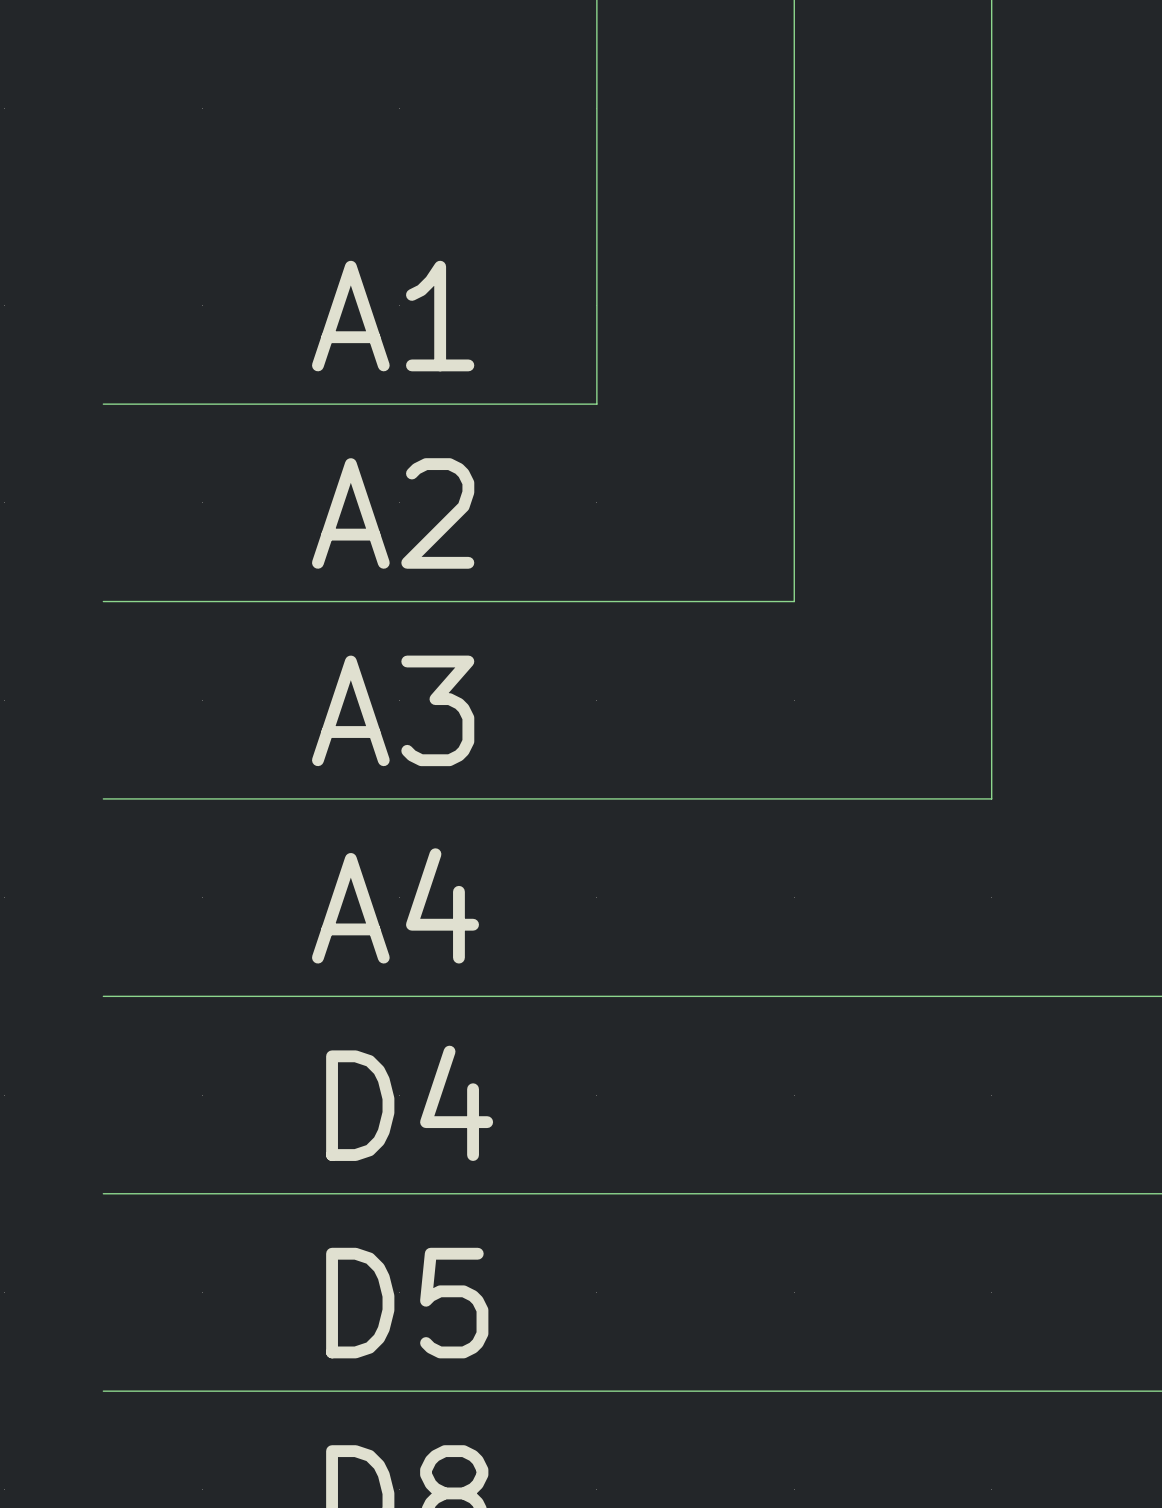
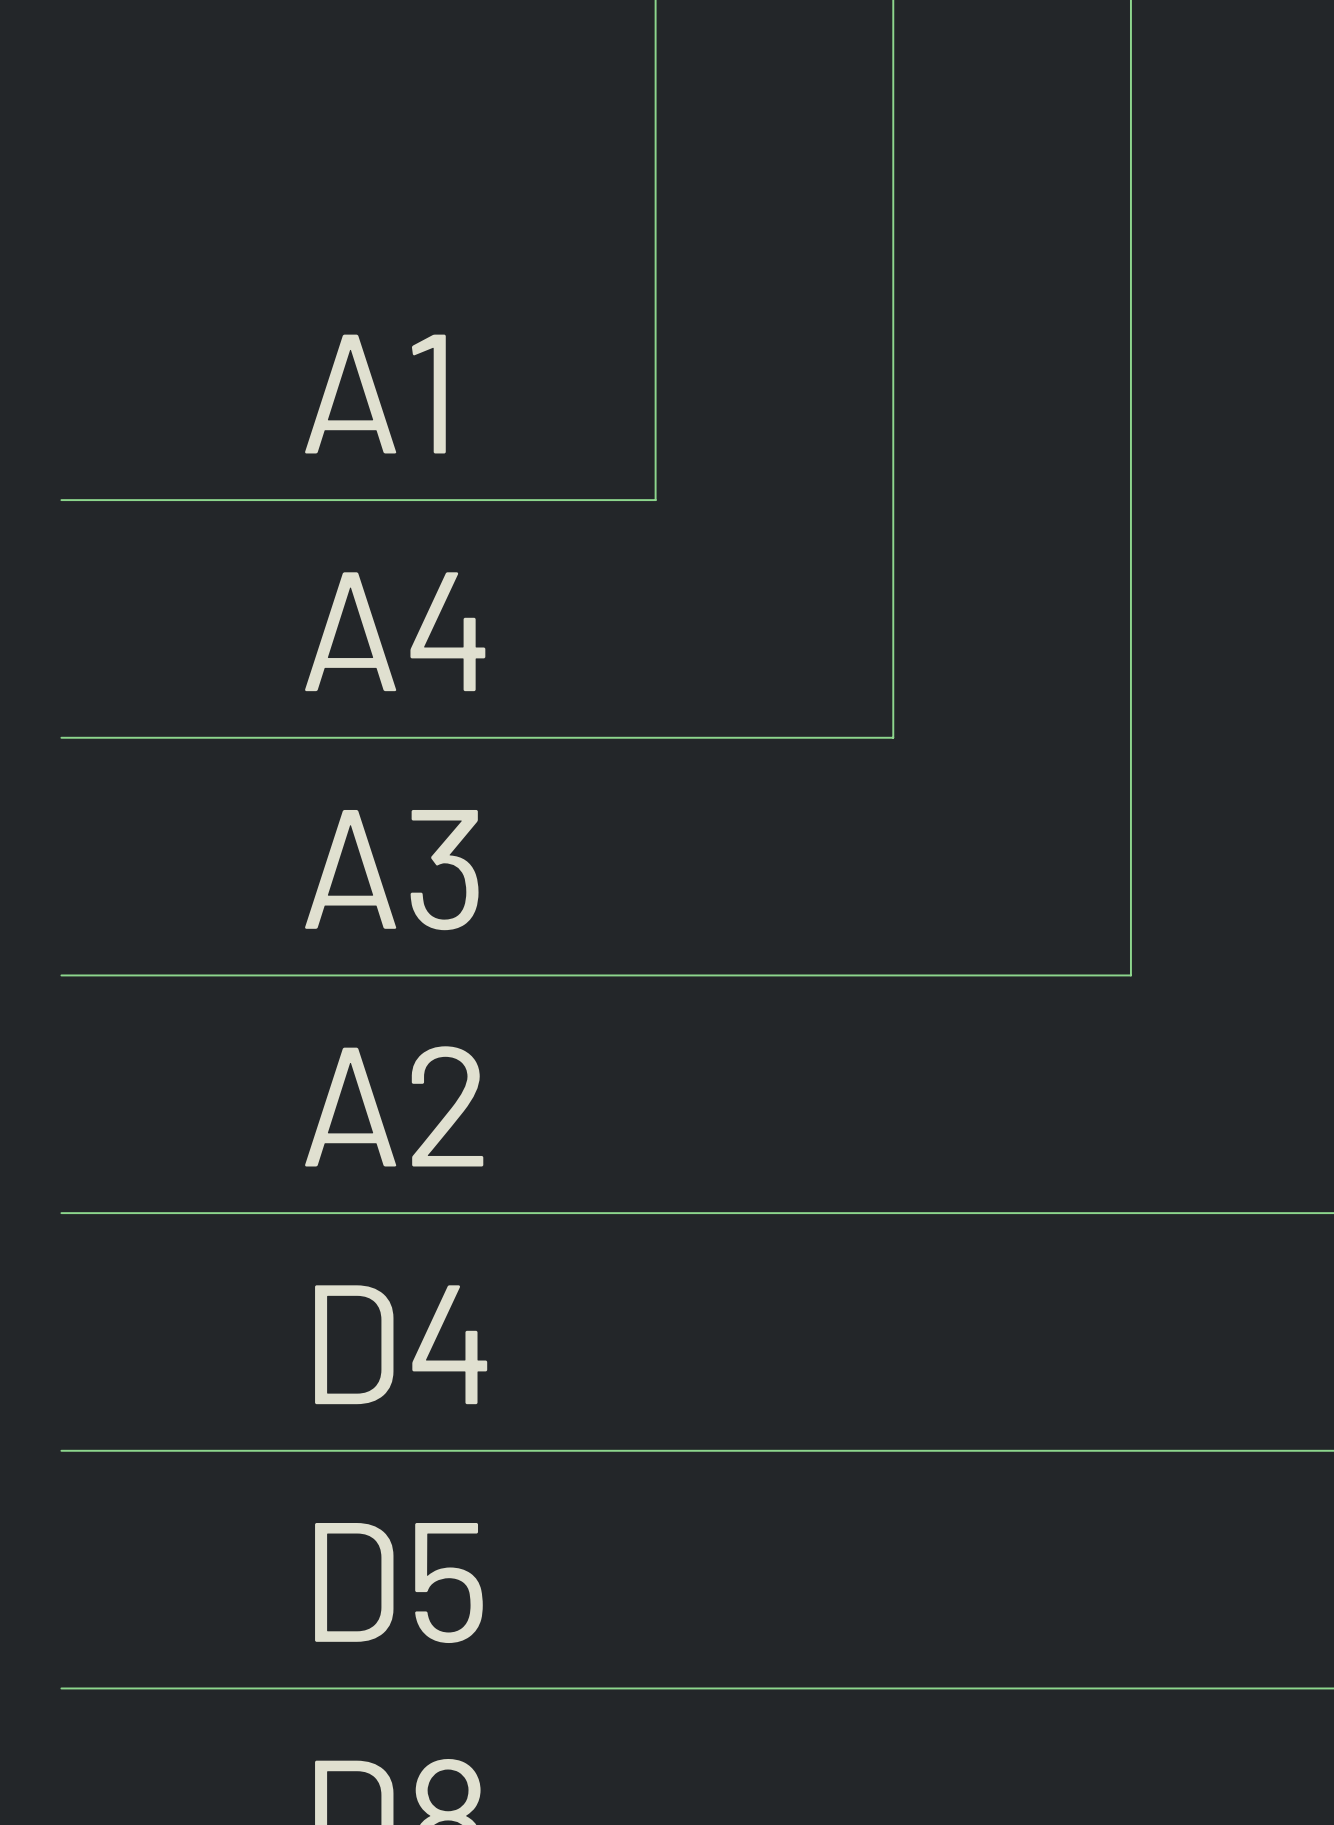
label: A2 (393, 513) -> A4 (395, 631)
label: A4 (395, 905) -> A2 (393, 1106)

